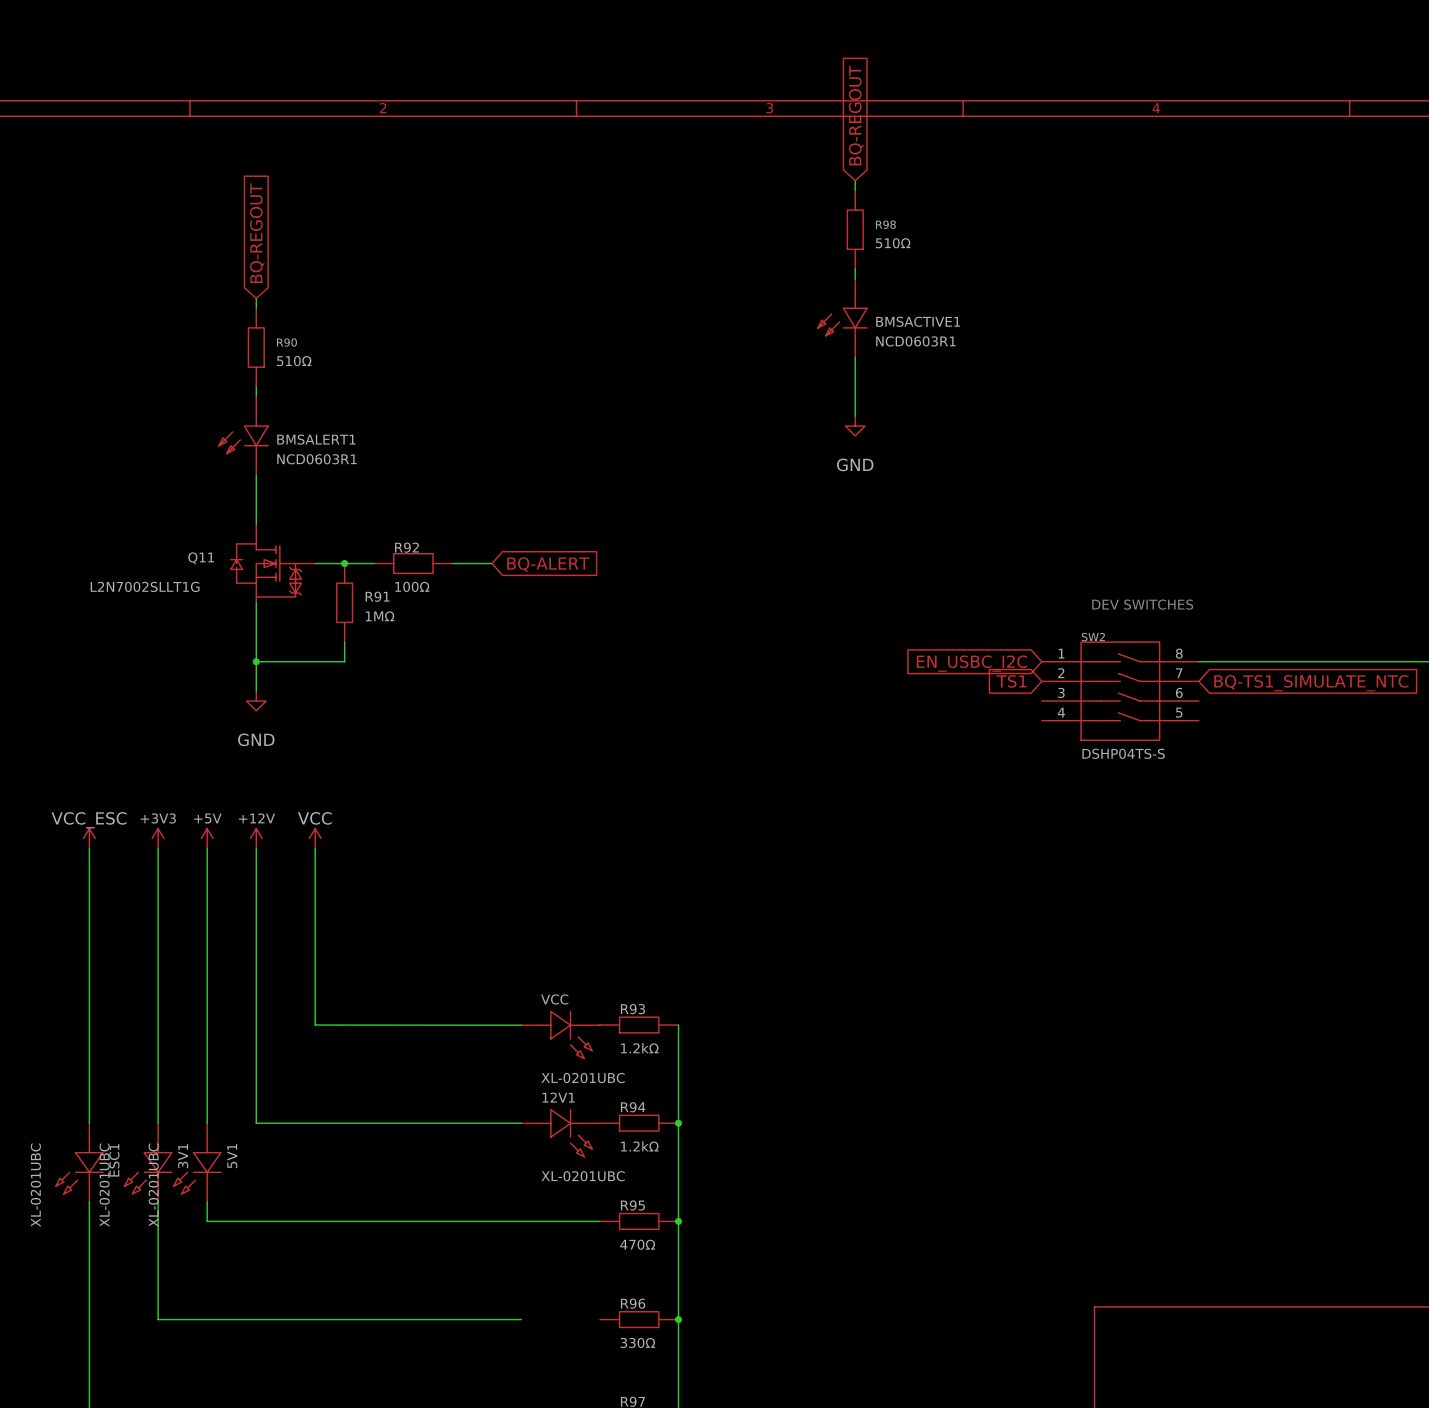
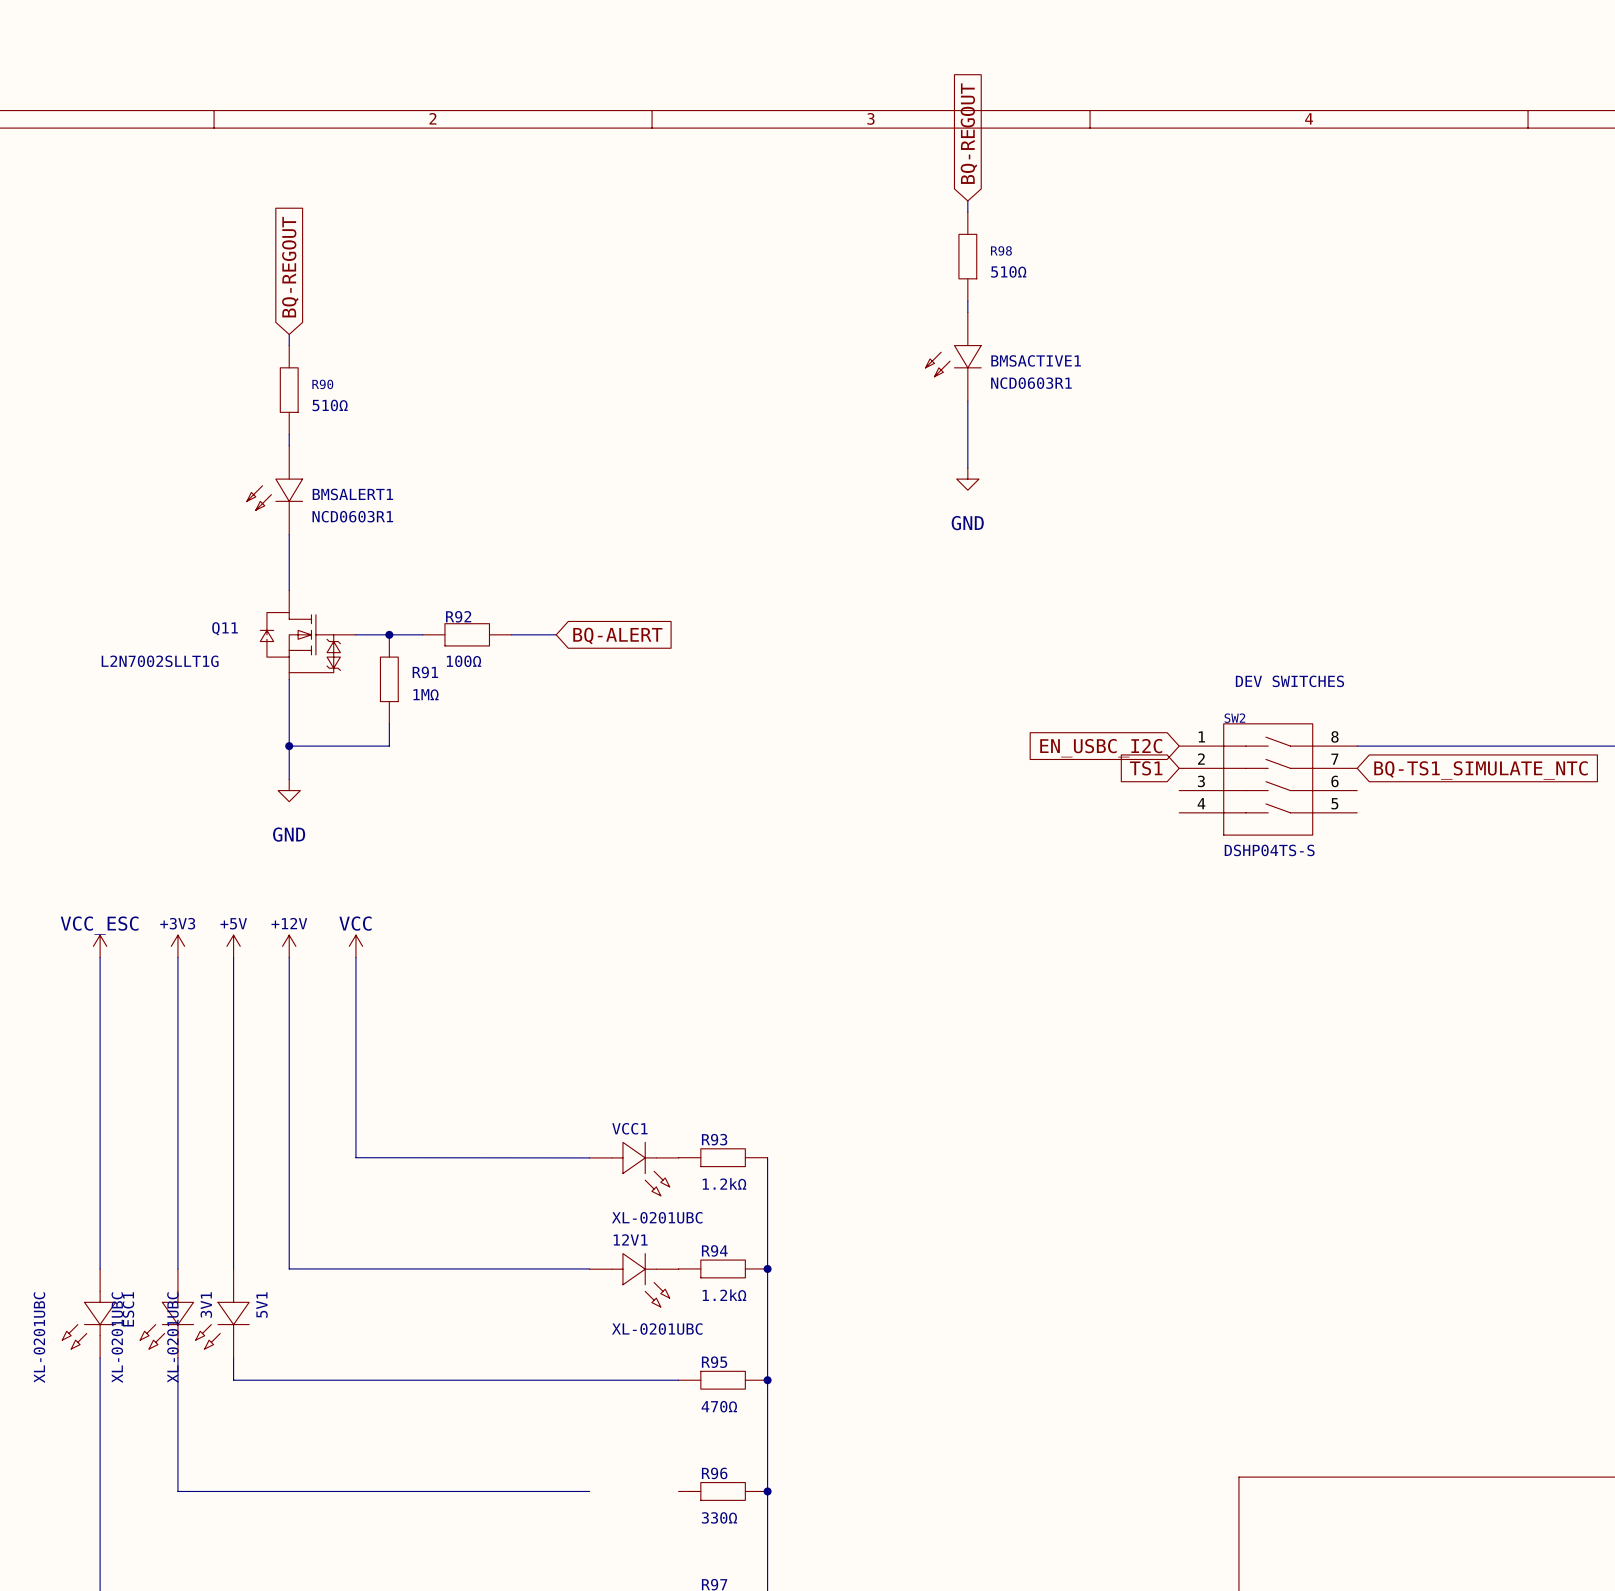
VCC name: VCC (554, 999) -> VCC1 (629, 1128)

